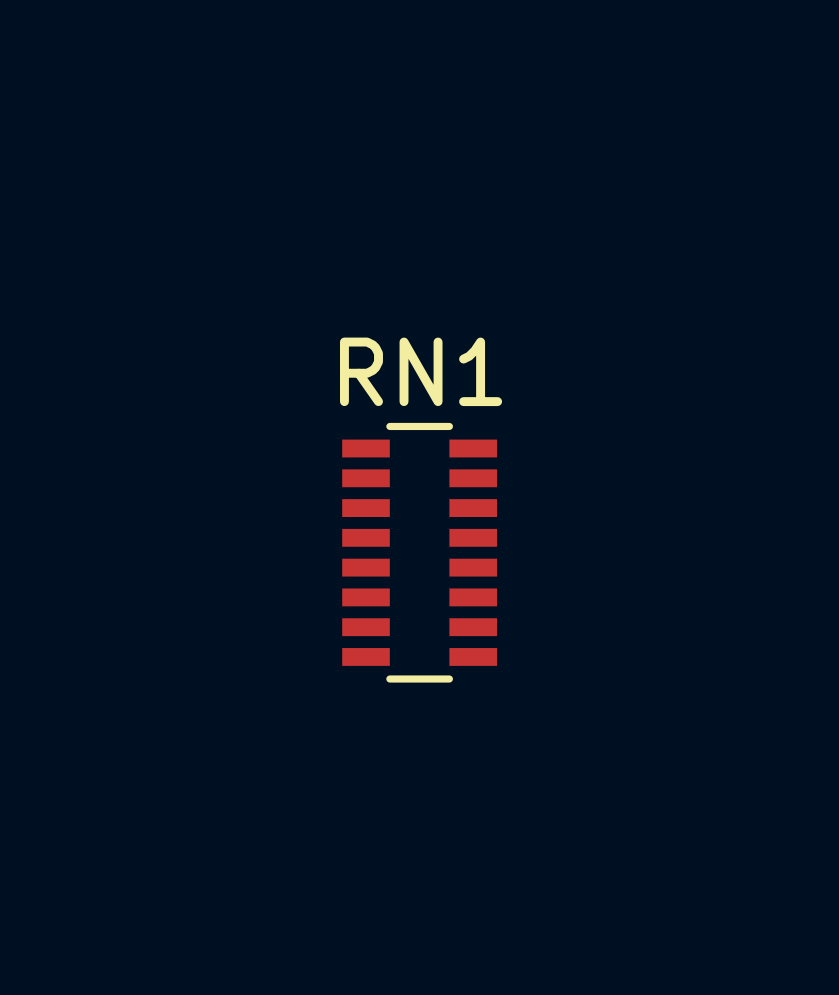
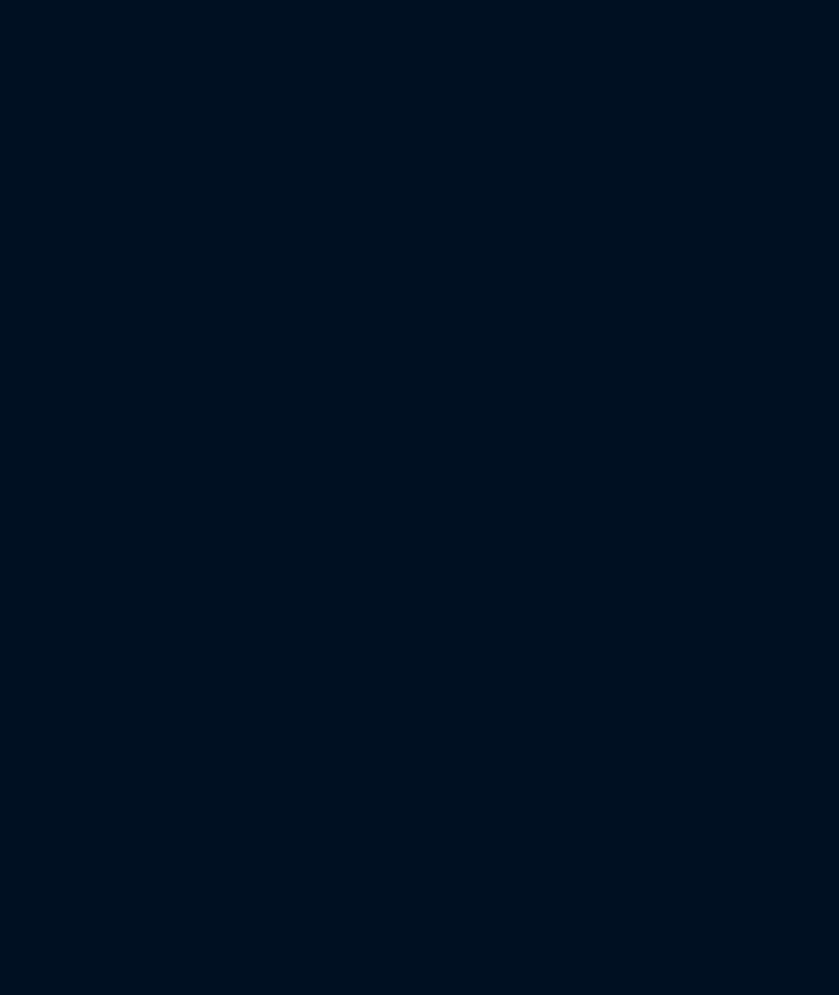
RN1: (419, 552) -> none

